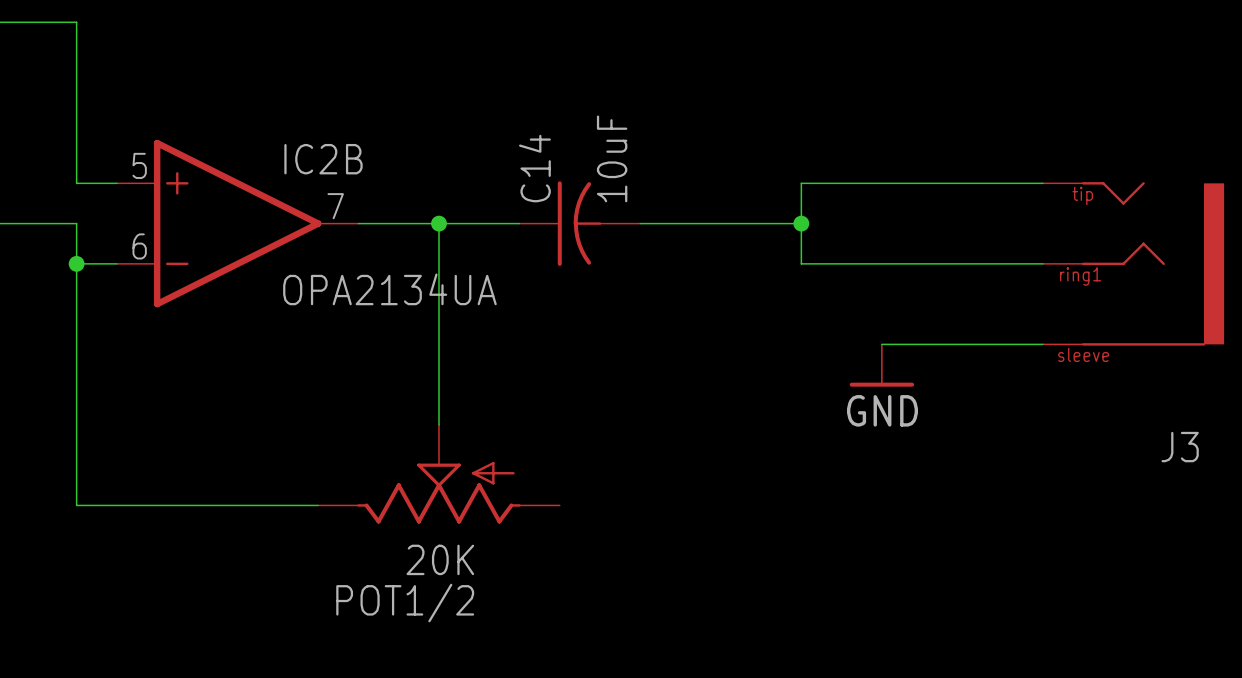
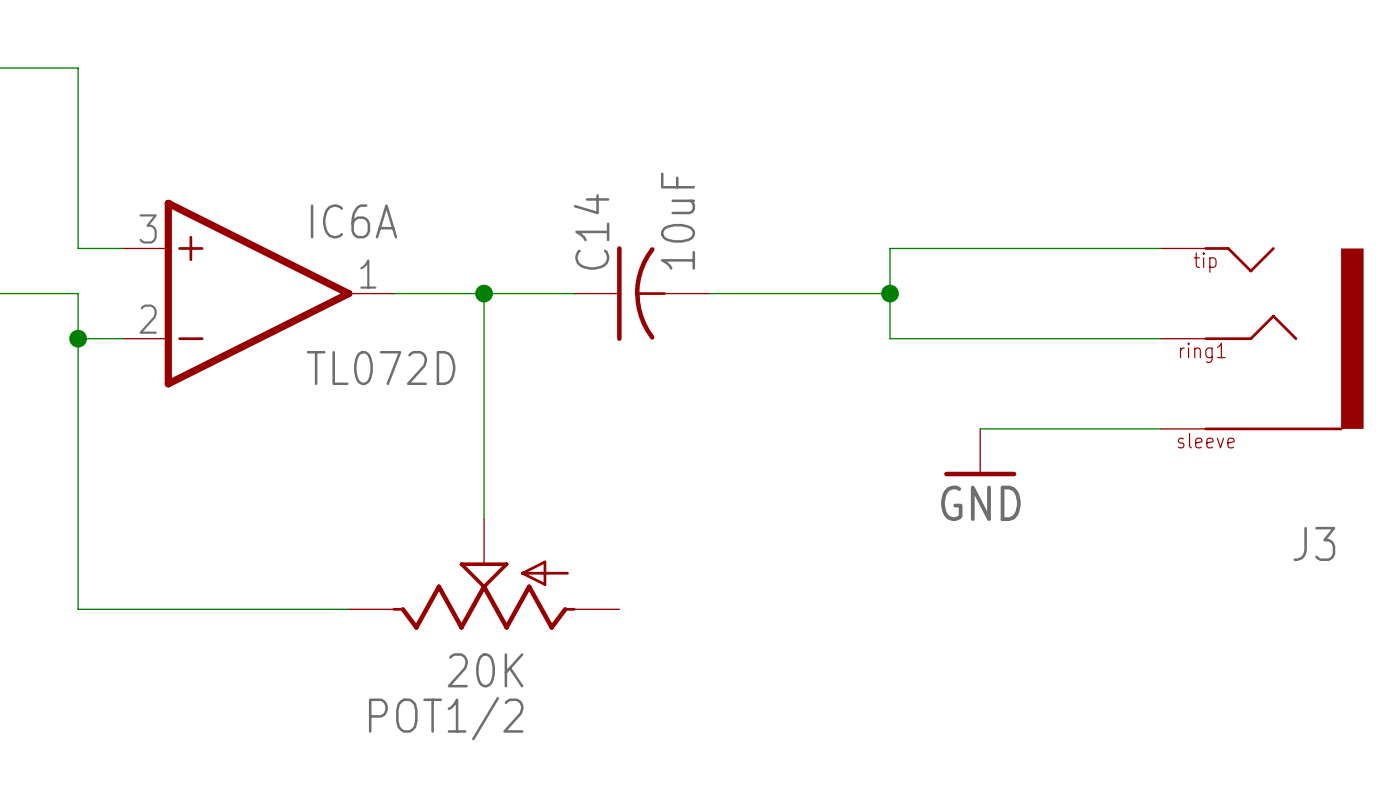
IC2B name: IC2B (323, 159) -> IC6A (354, 221)
IC2B pin number: 5 (139, 165) -> 3 (148, 228)
IC2B pin number: 7 (335, 206) -> 1 (368, 274)
IC2B pin number: 6 (139, 246) -> 2 (148, 319)
IC2B value: OPA2134UA (389, 289) -> TL072D (381, 368)

